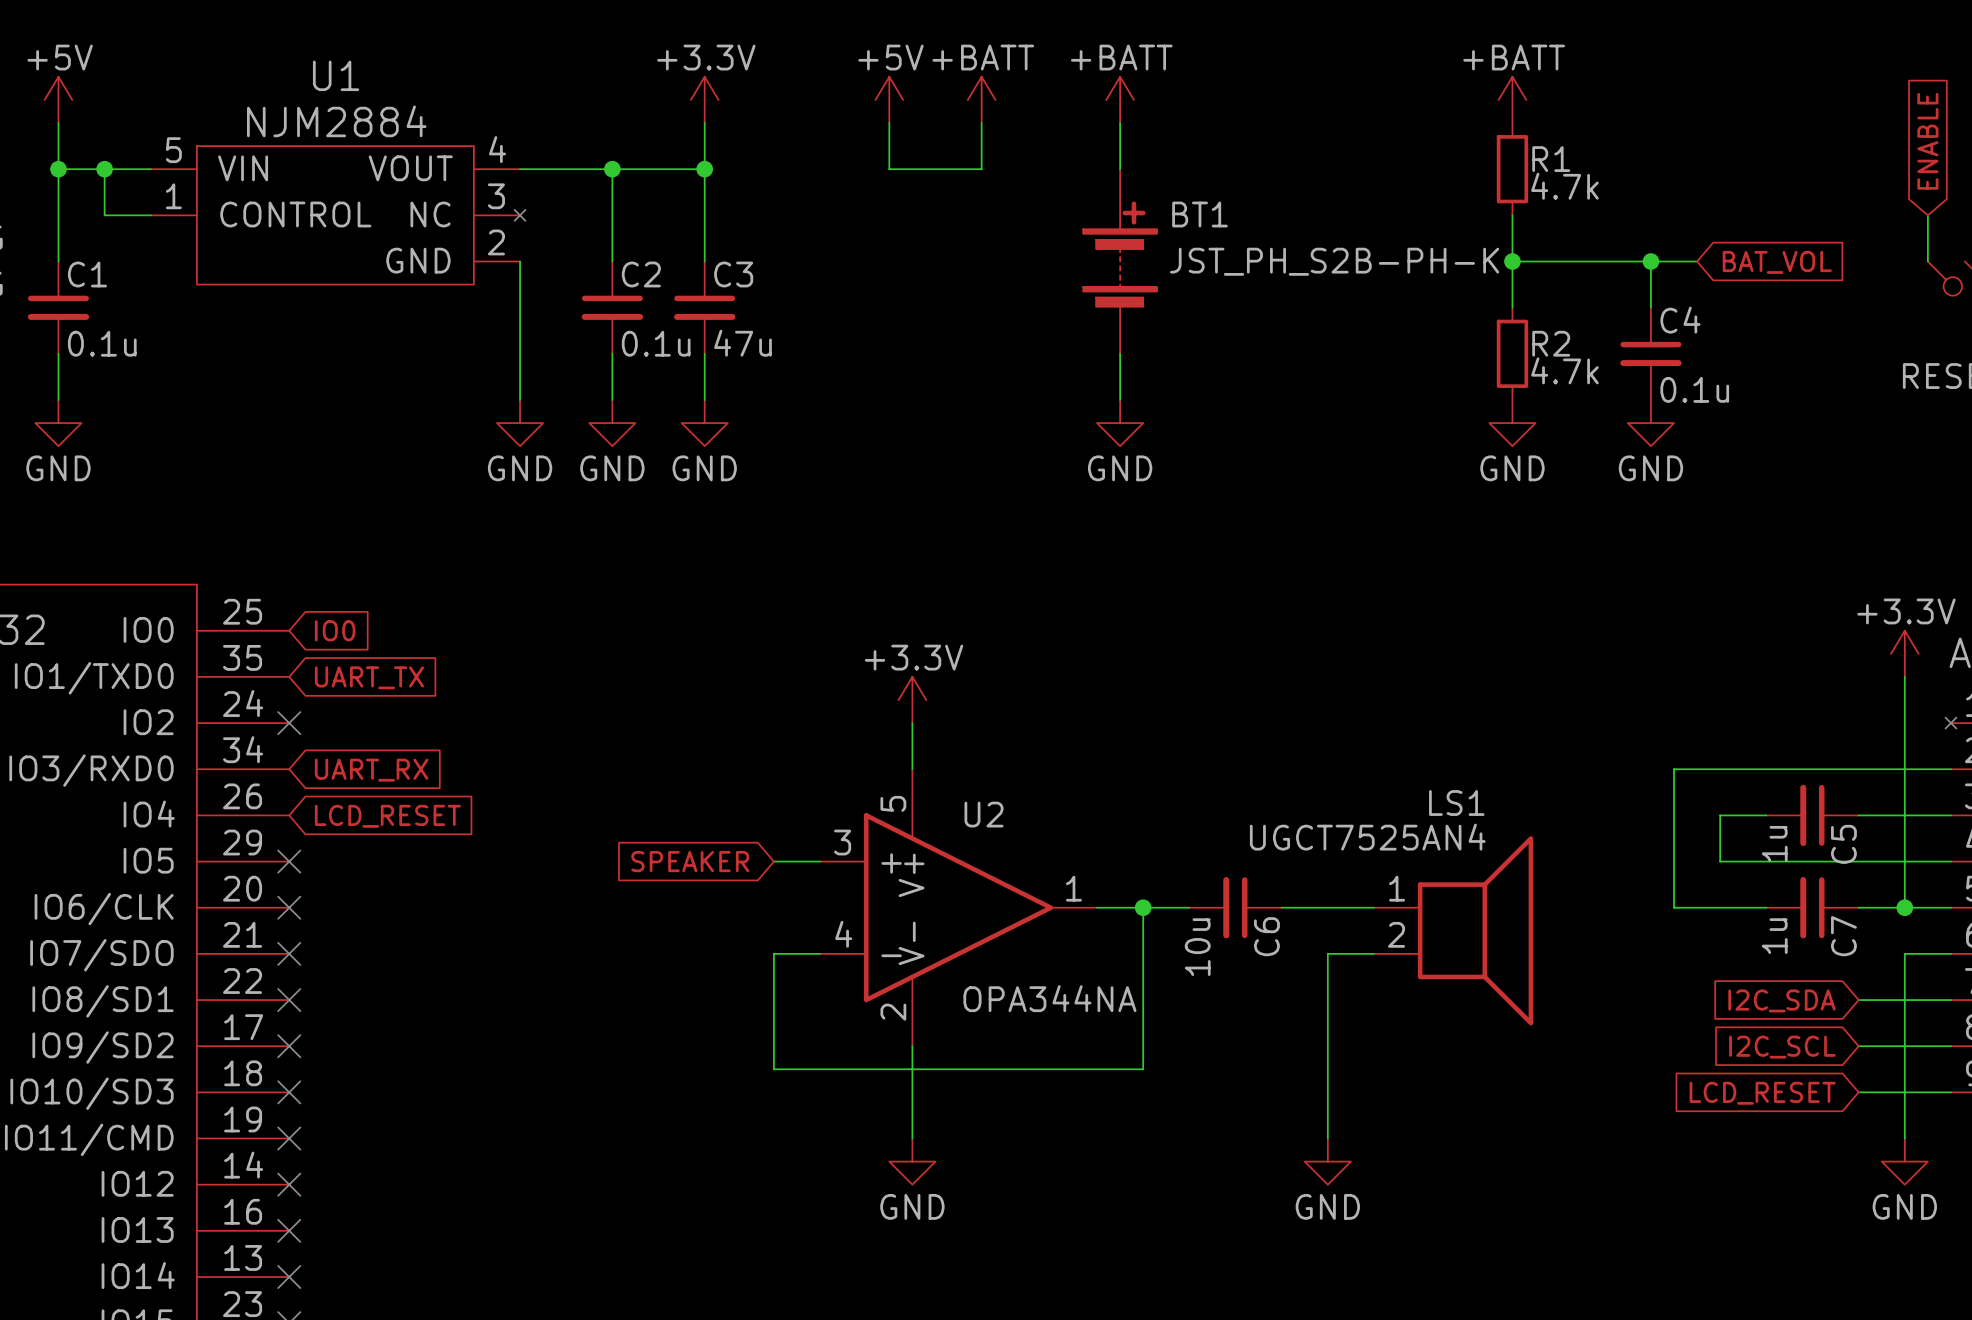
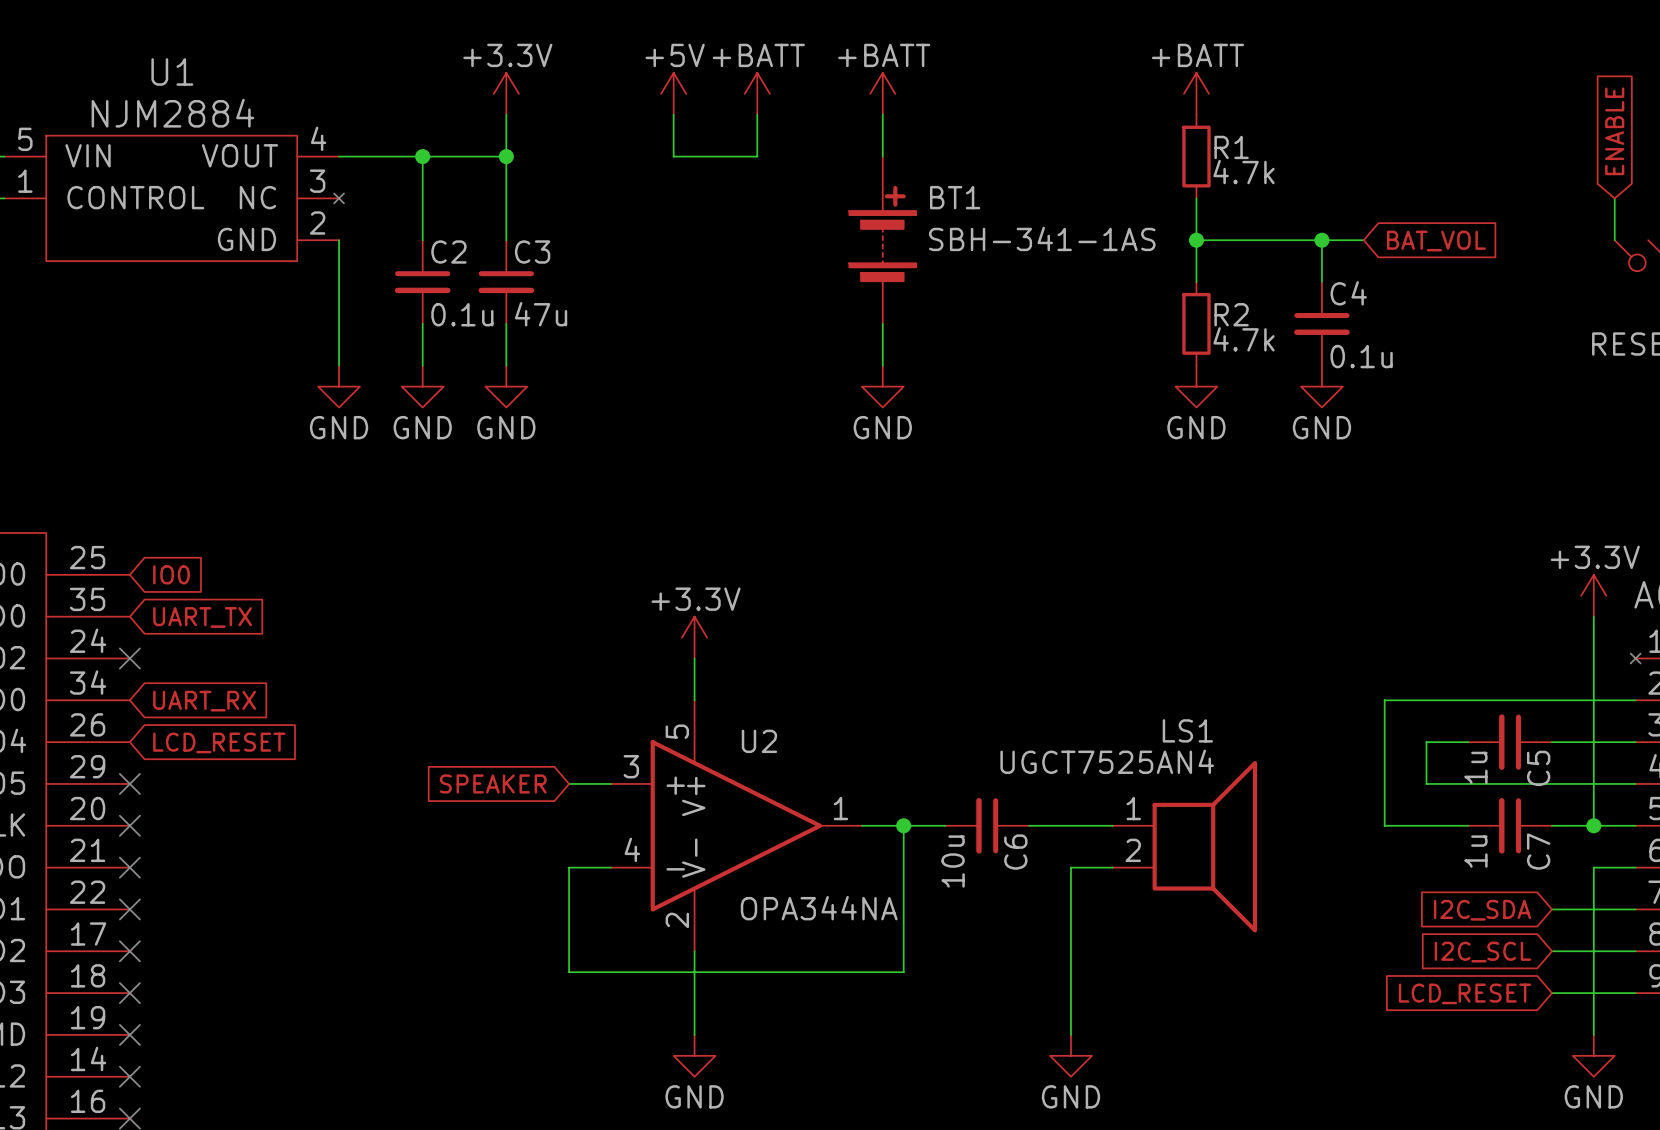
power symbol position: +BATT (1512, 99) -> +BATT (1196, 93)
R1 position: (1512, 169) -> (1196, 156)
wire: (1512, 215) (1512, 307) -> (1196, 198) (1196, 282)
BT1 value: JST_PH_S2B-PH-K (1334, 261) -> SBH-341-1AS (1042, 238)
wire: none -> (1196, 240) (1238, 240)
junction: none -> (1196, 240)
junction: (1512, 261) -> none
wire: none -> (1321, 240) (1321, 282)
junction: none -> (1321, 240)
junction: (1650, 261) -> none
wire: (1697, 261) (1650, 261) (1650, 307) -> none
global label position: BAT_VOL (1777, 262) -> BAT_VOL (1436, 241)
R2 position: (1512, 353) -> (1196, 323)
C4 position: (1650, 353) -> (1321, 323)
power symbol: none -> GND (1196, 386)
power symbol: GND (1512, 423) -> none
power symbol: none -> GND (1321, 386)
power symbol: GND (1650, 423) -> none

